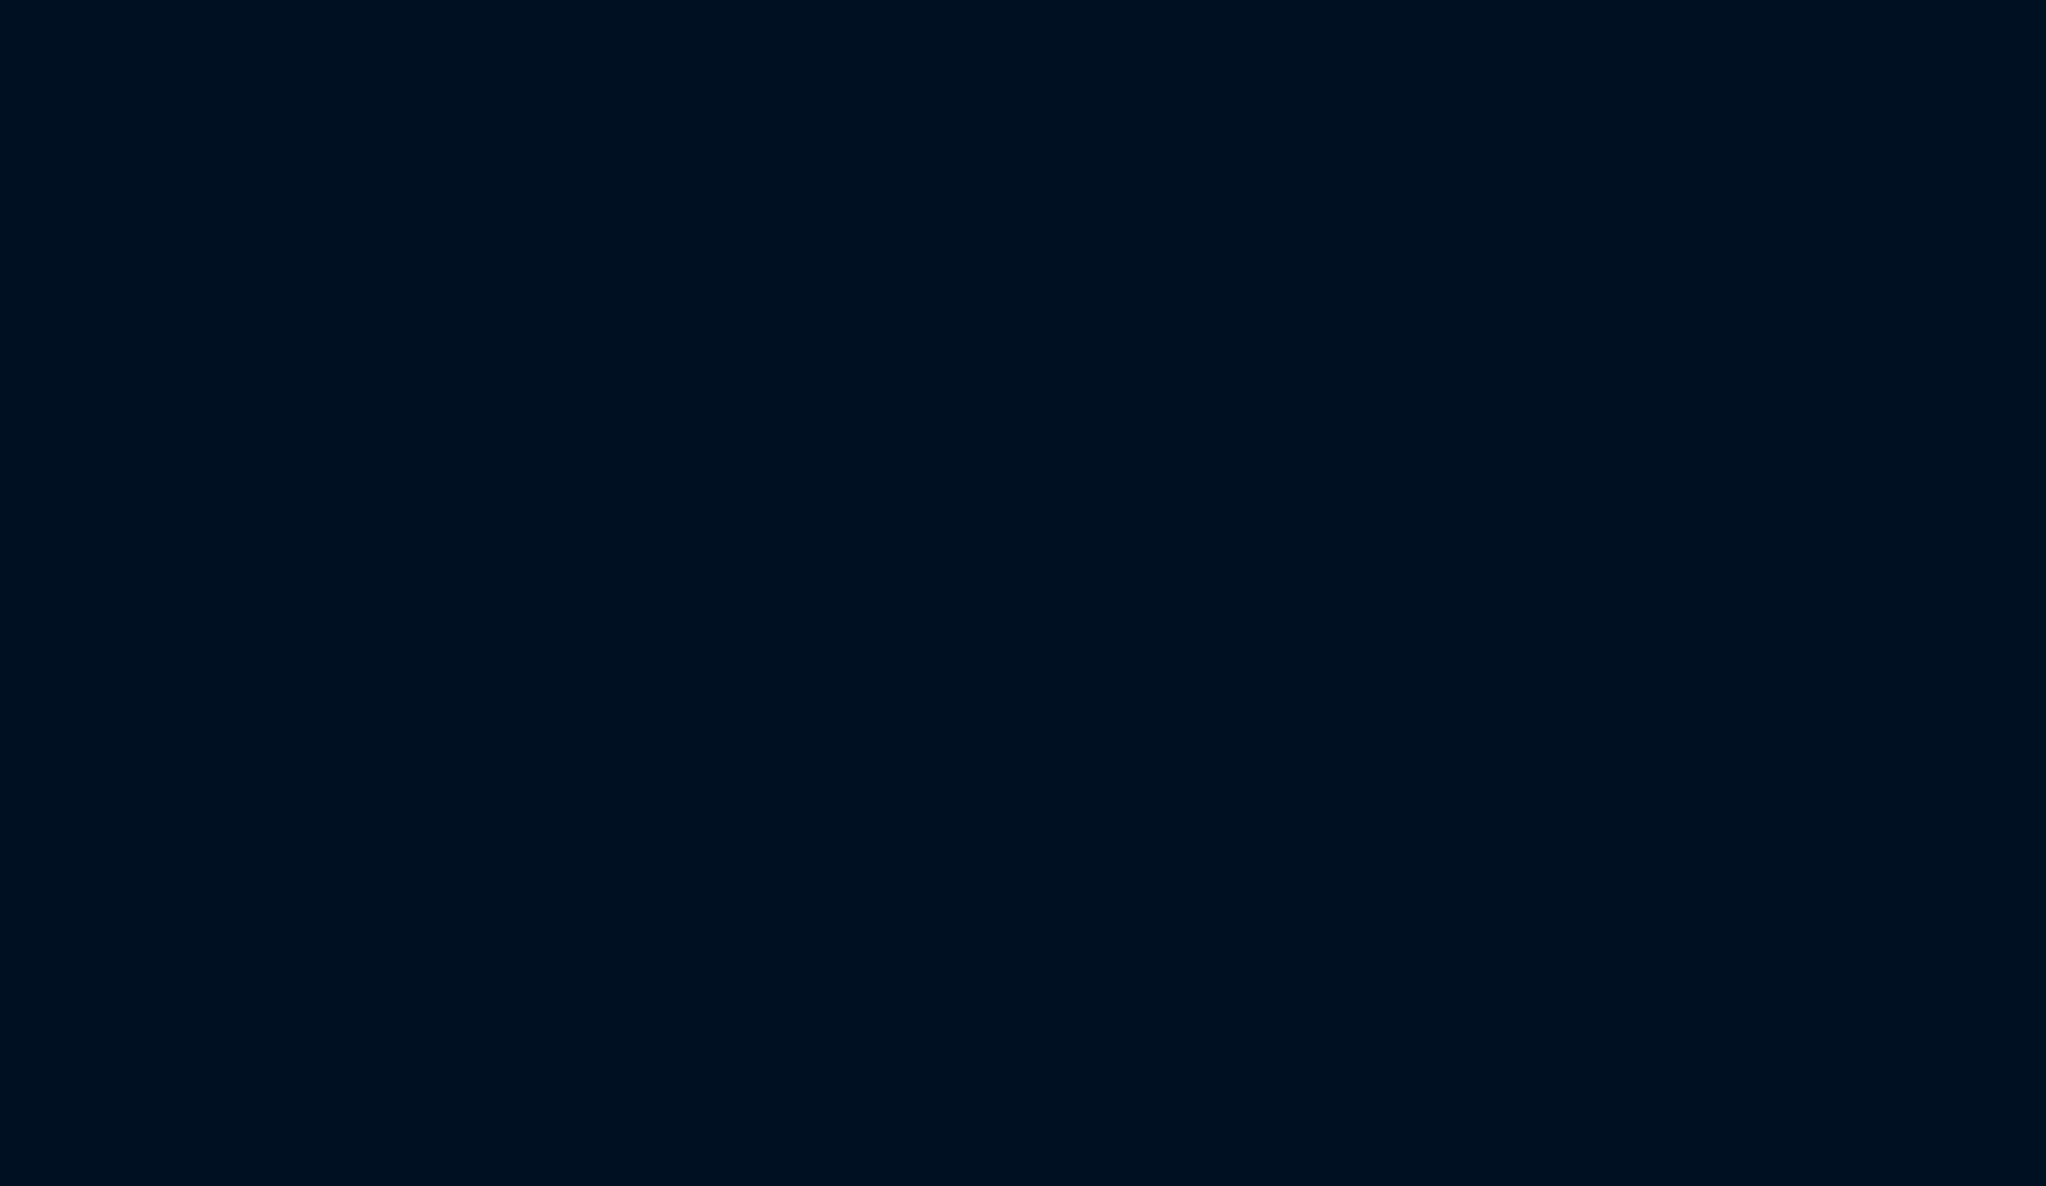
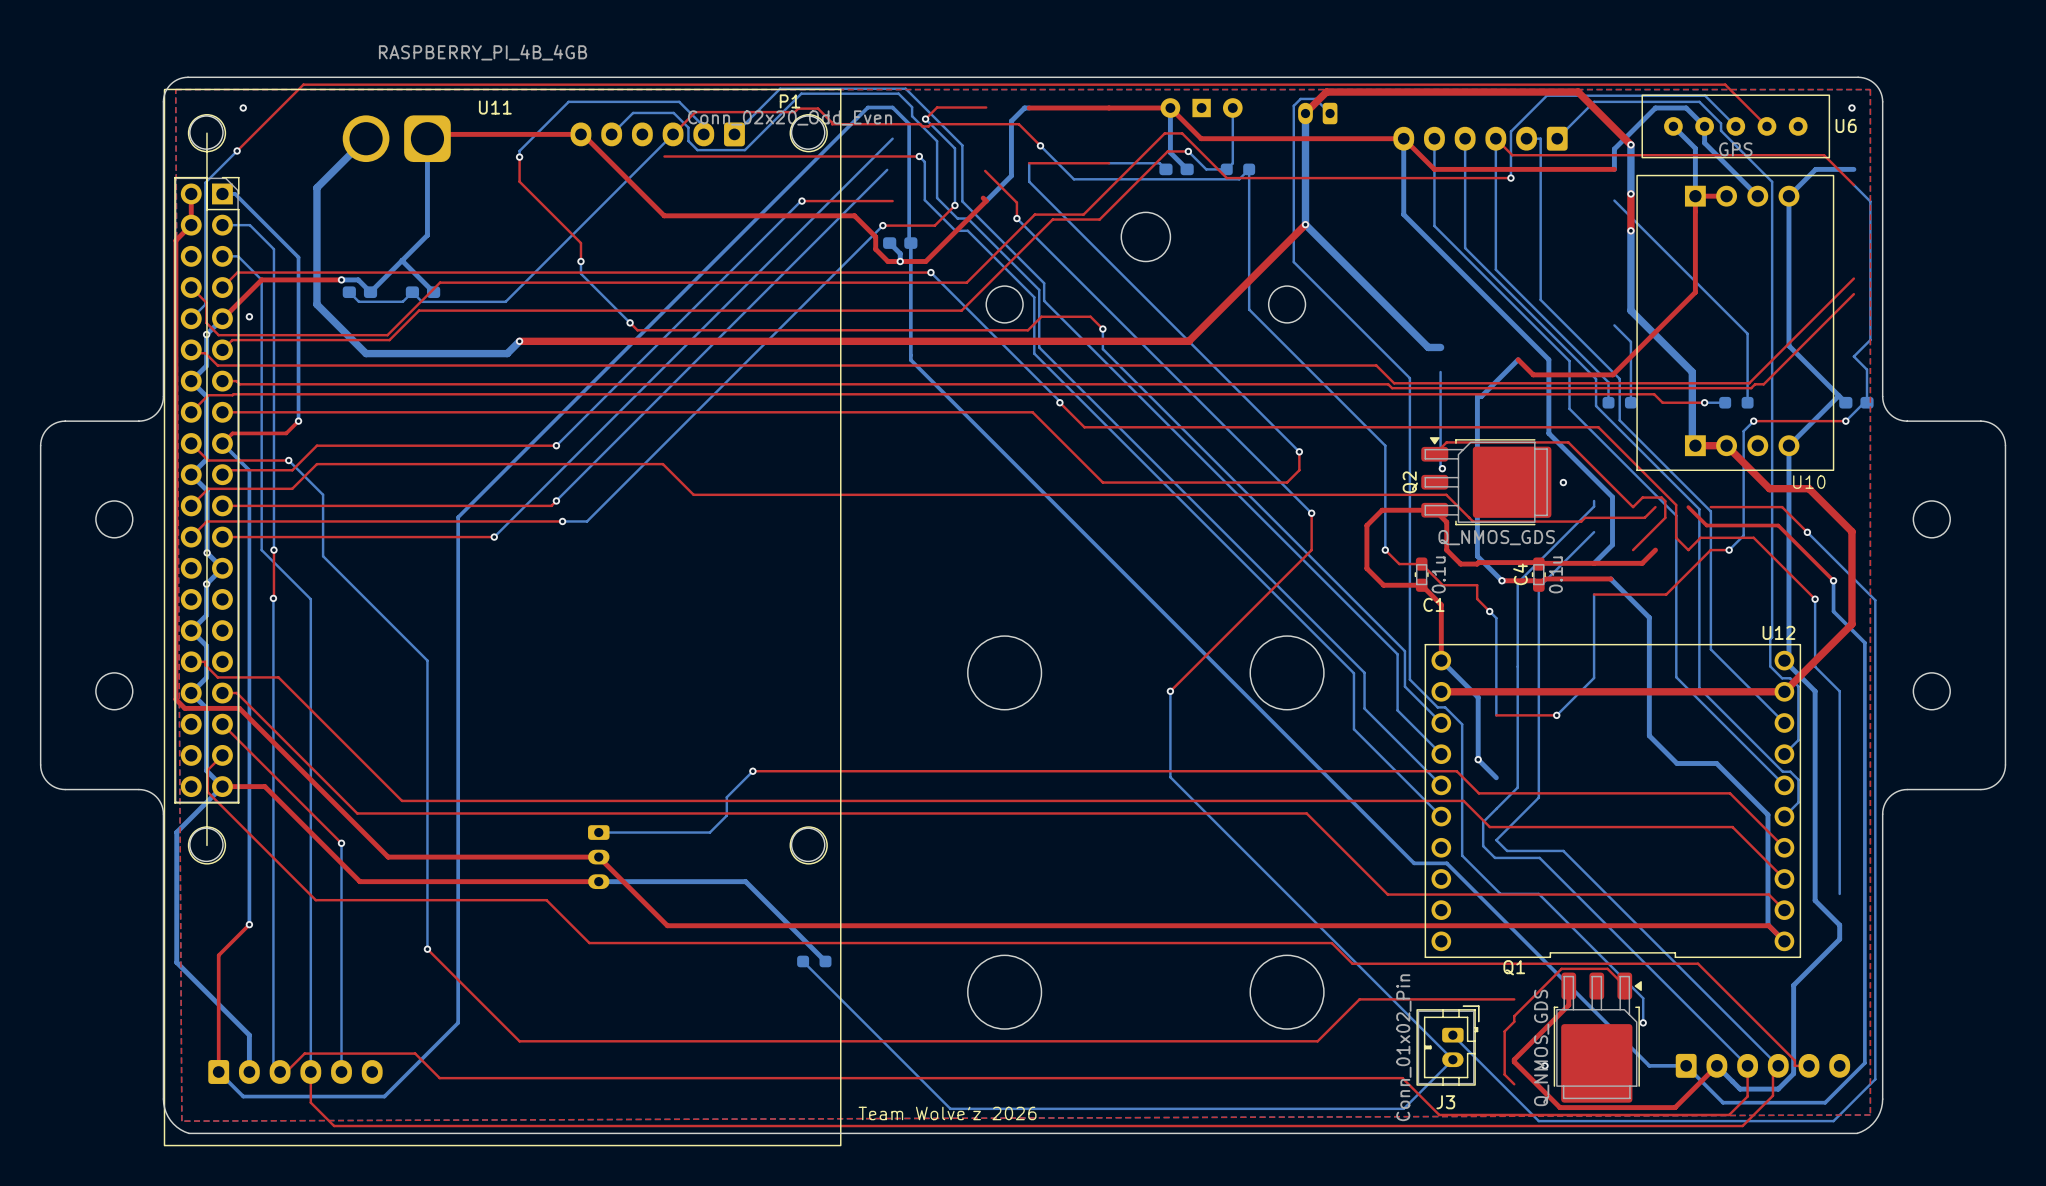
board edge: none -> (188, 77) (1858, 77) (1871, 81) (1880, 91) (1882, 101) (1884, 404) (1891, 415) (1904, 420) (1989, 422) (2001, 432) (2005, 445) (2004, 770) (2000, 780) (1989, 788) (1904, 789) (1891, 794) (1884, 806) (1882, 1099) (1878, 1116) (1869, 1127) (1857, 1133) (188, 1133) (180, 1129) (168, 1116) (163, 1099) (162, 806) (154, 794) (141, 789) (57, 788) (47, 782) (41, 770) (40, 445) (46, 430) (57, 422) (141, 420) (154, 415) (162, 404) (163, 99) (167, 88) (172, 82) (188, 77)
top zone outline: none -> (175, 89) (1870, 89) (1870, 1114) (181, 1121) (175, 89)
top track: none -> (986, 107) (937, 107) (925, 119)
via: none -> (243, 108)
top track: none -> (1029, 108) (1170, 108) (1201, 138) (1403, 138) (1434, 169) (1614, 169)
bottom track: none -> (1029, 108) (1024, 108) (1011, 121) (1011, 175) (986, 201)
bottom track: none -> (1170, 108) (1170, 152) (1187, 169)
part: none -> (1201, 108)
bottom track: none -> (1232, 108) (1232, 163) (1226, 169) (1206, 169) (1188, 151)
via: none -> (1851, 108)
top track: none -> (1305, 113) (1326, 92) (1578, 92) (1630, 144)
bottom track: none -> (1305, 113) (1305, 224) (1428, 347) (1440, 347)
part: none -> (1317, 113)
bottom track: none -> (1330, 113) (1315, 98) (1300, 98) (1293, 105) (1293, 262) (1409, 378) (1409, 679) (1437, 707) (1445, 707) (1462, 724) (1462, 855) (1500, 893) (1538, 893) (1643, 998) (1643, 1022)
round board edge: none -> [189, 115, 224, 150]
round board edge: none -> [790, 115, 826, 150]
bottom track: none -> (925, 119) (954, 148) (954, 205)
via: none -> (925, 119)
bottom track: none -> (1673, 126) (1695, 148) (1695, 196)
bottom track: none -> (1735, 126) (1705, 95) (1546, 95) (1510, 131) (1510, 178)
U6: none -> GPS (1735, 126)
top track: none -> (1766, 126) (1725, 84) (303, 84) (237, 150)
bottom track: none -> (611, 134) (633, 112) (673, 112) (688, 127) (688, 141) (697, 150) (744, 150) (801, 93) (898, 93) (912, 107) (912, 116) (937, 141) (937, 198) (957, 218) (967, 218) (1039, 289) (1039, 347) (1364, 672) (1364, 708) (1441, 785)
part: none -> (657, 134)
top track: none -> (673, 134) (695, 112) (794, 112) (798, 108) (818, 108) (832, 124) (920, 124) (922, 126) (928, 126) (930, 124) (1018, 124) (1040, 145)
bottom track: none -> (673, 134) (505, 301) (422, 301) (412, 292) (402, 301) (358, 301) (349, 292)
bottom track: none -> (703, 134) (703, 126) (679, 101) (568, 101) (519, 150) (519, 157)
bottom track: none -> (734, 134) (780, 88) (905, 88) (962, 145) (962, 201) (1044, 283) (1044, 300) (1397, 654) (1397, 710) (1441, 754)
bottom track: none -> (366, 138) (316, 187) (316, 304) (366, 353) (507, 353) (519, 341)
part: none -> (396, 138)
top track: none -> (427, 138) (431, 134) (582, 134) (664, 215) (854, 215) (875, 236) (875, 249) (887, 261) (925, 261) (986, 201) (983, 198)
bottom track: none -> (427, 138) (427, 235) (370, 292) (358, 279) (341, 279)
bottom track: none -> (892, 138) (494, 537)
bottom track: none -> (1403, 138) (1403, 214) (1548, 359) (1548, 433) (1612, 497) (1612, 544) (1594, 563)
bottom track: none -> (1434, 138) (1434, 225) (1569, 361) (1569, 408) (1676, 515) (1676, 677) (1784, 785)
bottom track: none -> (1465, 138) (1465, 248) (1596, 379) (1596, 405) (1699, 509) (1699, 688) (1782, 771) (1790, 771) (1798, 779) (1798, 802) (1784, 816)
part: none -> (1480, 138)
top track: none -> (1495, 138) (1512, 155) (1824, 155) (1853, 184)
bottom track: none -> (1495, 138) (1495, 269) (1608, 382) (1608, 402)
bottom track: none -> (1526, 138) (1540, 138) (1540, 299) (1619, 378) (1619, 420) (1710, 511) (1710, 649) (1784, 722)
bottom track: none -> (1557, 138) (1594, 101) (1699, 101) (1721, 123) (1721, 130) (1772, 181) (1772, 637) (1770, 639) (1770, 666) (1782, 678) (1790, 678) (1798, 686) (1798, 740) (1784, 754)
bottom track: none -> (1630, 144) (1630, 193)
via: none -> (1630, 144)
bottom track: none -> (1040, 145) (1073, 179) (1239, 179) (1249, 169) (1249, 309) (1385, 445) (1385, 550)
via: none -> (1040, 145)
bottom track: none -> (237, 150) (205, 182) (205, 304) (191, 318)
via: none -> (237, 150)
top track: none -> (1188, 151) (1167, 151) (1099, 219) (1052, 219) (961, 310) (419, 310) (389, 340) (232, 340) (222, 349)
via: none -> (1188, 151)
top track: none -> (664, 156) (919, 156)
bottom track: none -> (919, 156) (924, 161) (924, 200) (955, 230) (967, 230) (1034, 297) (1034, 353) (1353, 673) (1353, 729) (1441, 816)
via: none -> (919, 156)
top track: none -> (519, 157) (519, 181) (580, 243) (580, 261)
via: none -> (519, 157)
top track: none -> (1029, 163) (1109, 163)
bottom track: none -> (1029, 163) (1029, 181) (1299, 451)
bottom track: none -> (1109, 163) (1159, 163) (1165, 169)
bottom track: none -> (887, 169) (556, 500)
part: none -> (1176, 169)
part: none -> (1237, 169)
bottom track: none -> (1614, 169) (1614, 149) (1655, 108) (1686, 108) (1704, 126) (1704, 143) (1757, 196)
bottom track: none -> (1853, 169) (1815, 169) (1788, 196) (1788, 345) (1845, 402)
top track: none -> (985, 170) (1016, 202) (1016, 218)
top track: none -> (1510, 178) (1226, 178) (1182, 133) (1164, 133) (1083, 214) (1034, 214) (966, 282) (440, 282) (387, 335) (218, 335) (206, 322) (206, 302) (191, 287)
via: none -> (1510, 178)
bottom track: none -> (1853, 184) (1870, 201) (1870, 340) (1853, 356) (1867, 369) (1867, 402) (1864, 402) (1845, 421)
top track: none -> (191, 193) (191, 225) (175, 240) (175, 699) (184, 708) (239, 708) (388, 857) (598, 857) (667, 925) (1768, 925) (1784, 941)
bottom track: none -> (222, 193) (235, 193) (298, 257) (298, 421)
top track: none -> (1630, 193) (1630, 230)
via: none -> (1630, 193)
top track: none -> (1726, 196) (1695, 196) (1695, 292) (1612, 374) (1533, 374) (1518, 359)
bottom track: none -> (1614, 200) (1747, 333) (1747, 402)
top track: none -> (801, 201) (892, 201)
bottom track: none -> (802, 201) (556, 445)
via: none -> (802, 201)
top track: none -> (954, 205) (934, 225) (882, 225)
via: none -> (954, 205)
round board edge: none -> [1120, 211, 1172, 263]
bottom track: none -> (1016, 218) (1311, 513)
via: none -> (1016, 218)
top track: none -> (1305, 224) (1188, 341) (519, 341)
via: none -> (1305, 224)
bottom track: none -> (222, 225) (249, 225) (273, 249) (273, 550)
bottom track: none -> (882, 225) (587, 521) (562, 521)
via: none -> (882, 225)
bottom track: none -> (1630, 230) (1630, 310) (1692, 372) (1692, 442) (1695, 445)
via: none -> (1630, 230)
bottom track: none -> (889, 243) (900, 253) (900, 261)
part: none -> (900, 243)
bottom track: none -> (910, 243) (910, 360) (1414, 863) (1446, 863) (1649, 1065) (1686, 1065) (1723, 1102) (1825, 1102) (1864, 1063) (1864, 642) (1833, 611) (1833, 580)
bottom track: none -> (910, 243) (909, 241) (909, 124) (892, 107) (867, 107) (458, 517) (458, 1022) (384, 1096) (243, 1096) (218, 1071)
bottom track: none -> (222, 256) (238, 256) (261, 279) (261, 550) (310, 599) (310, 1071)
bottom track: none -> (402, 260) (433, 292)
bottom track: none -> (580, 261) (580, 273) (630, 322)
via: none -> (580, 261)
via: none -> (900, 261)
top track: none -> (930, 272) (237, 272) (222, 287)
bottom track: none -> (930, 272) (1059, 402)
via: none -> (930, 272)
top track: none -> (1853, 278) (1749, 383) (1394, 383) (1376, 365) (217, 365) (205, 353) (194, 353) (191, 349)
top track: none -> (341, 279) (261, 279) (222, 318)
via: none -> (341, 279)
round board edge: none -> [985, 285, 1024, 324]
round board edge: none -> [1268, 285, 1307, 324]
part: none -> (359, 292)
part: none -> (423, 292)
top track: none -> (1853, 294) (1763, 384) (1755, 384) (1751, 388) (1392, 388) (1388, 384) (239, 384) (236, 381) (222, 381)
via: none -> (249, 316)
bottom track: none -> (222, 318) (206, 334) (206, 365) (191, 381) (206, 396) (206, 459) (191, 474) (207, 490) (207, 552) (222, 568) (206, 584) (206, 615) (191, 630) (206, 645) (206, 677) (191, 693) (206, 708) (206, 770) (222, 786) (176, 832) (176, 962) (249, 1035) (249, 1071)
top track: none -> (630, 322) (637, 330) (1027, 330) (1041, 316) (1090, 316) (1102, 329)
via: none -> (630, 322)
U10: none -> (1735, 322)
bottom track: none -> (1614, 325) (1630, 341) (1630, 402)
bottom track: none -> (1102, 329) (1102, 349) (1404, 651) (1404, 686) (1441, 722)
via: none -> (1102, 329)
via: none -> (206, 334)
via: none -> (519, 341)
bottom track: none -> (1518, 359) (1481, 396) (1477, 396) (1477, 556) (1501, 580) (1505, 580)
bottom track: none -> (1440, 372) (1440, 466) (1442, 468)
bottom track: none -> (1838, 395) (1788, 445) (1788, 656) (1784, 660) (1815, 691) (1815, 900) (1839, 925) (1839, 939) (1793, 985) (1793, 1073) (1778, 1089) (1740, 1089) (1716, 1065)
top track: none -> (1059, 402) (1084, 427) (1598, 427) (1676, 505) (1676, 537) (1688, 550) (1700, 537) (1753, 537) (1815, 599)
via: none -> (1059, 402)
part: none -> (1619, 402)
top track: none -> (1704, 402) (1662, 402) (1654, 394) (233, 394) (208, 395) (191, 412)
bottom track: none -> (1704, 402) (1725, 402)
via: none -> (1704, 402)
part: none -> (1736, 402)
part: none -> (1856, 402)
top track: none -> (222, 412) (1032, 412) (1102, 482) (1287, 482) (1299, 470) (1299, 451)
top track: none -> (298, 421) (286, 433) (232, 433) (222, 443)
via: none -> (298, 421)
top track: none -> (1753, 421) (1845, 421)
bottom track: none -> (1753, 421) (1743, 431) (1743, 535) (1729, 550)
via: none -> (1753, 421)
via: none -> (1845, 421)
top track: none -> (191, 443) (208, 460) (288, 460)
bottom track: none -> (222, 443) (249, 470) (249, 924)
top track: none -> (556, 445) (316, 445) (292, 470) (226, 470) (222, 474)
via: none -> (556, 445)
top track: none -> (1695, 445) (1726, 445) (1769, 488) (1808, 488) (1851, 531) (1851, 624) (1784, 691) (1441, 691)
via: none -> (1299, 451)
top track: none -> (1434, 454) (1446, 442) (1568, 442) (1633, 507) (1642, 497) (1661, 497) (1665, 501) (1665, 517) (1633, 550)
bottom track: none -> (288, 460) (323, 494) (323, 556) (427, 660) (427, 949)
via: none -> (288, 460)
via: none -> (1442, 468)
Q2: none -> Q_NMOS_GDS (1486, 481)
via: none -> (1563, 482)
round board edge: none -> [95, 500, 134, 539]
top track: none -> (227, 500) (222, 505) (551, 505) (556, 500)
via: none -> (556, 500)
bottom track: none -> (1594, 500) (1594, 506) (1517, 582) (1517, 787) (1483, 822) (1483, 846) (1495, 857) (1539, 857) (1747, 1065)
round board edge: none -> [1912, 500, 1951, 539]
top track: none -> (191, 505) (208, 488) (292, 488) (316, 464) (662, 464) (693, 494) (1446, 494) (1473, 521) (1581, 521) (1585, 517) (1644, 517) (1655, 507)
top track: none -> (1688, 507) (1706, 525) (1778, 525) (1833, 580)
top track: none -> (1710, 507) (1782, 507) (1807, 532)
top track: none -> (1311, 513) (1311, 550) (1170, 691)
via: none -> (1311, 513)
top track: none -> (562, 521) (206, 521) (191, 537)
via: none -> (562, 521)
bottom track: none -> (1594, 532) (1538, 587) (1538, 797) (1496, 840) (1507, 850) (1563, 850) (1778, 1065)
bottom track: none -> (1807, 532) (1875, 600) (1875, 1079) (1833, 1121) (1538, 1121) (1452, 1035)
via: none -> (1807, 532)
top track: none -> (222, 537) (494, 537)
via: none -> (494, 537)
top track: none -> (273, 550) (273, 598)
via: none -> (273, 550)
top track: none -> (1385, 550) (1399, 564) (1421, 564) (1442, 585) (1477, 585) (1477, 598) (1489, 611)
via: none -> (1385, 550)
top track: none -> (1655, 550) (1642, 563) (1460, 564) (1446, 550) (1446, 522) (1434, 510) (1382, 510) (1366, 525) (1366, 568) (1383, 585) (1421, 585) (1441, 604) (1441, 660)
top track: none -> (1729, 550) (1710, 550) (1666, 594) (1594, 594)
via: none -> (1729, 550)
via: none -> (207, 552)
C1: none -> 0.1u (1421, 574)
C4: none -> 0.1u (1538, 574)
top track: none -> (1610, 578) (1545, 578) (1538, 585)
bottom track: none -> (1610, 578) (1649, 617) (1649, 735) (1677, 763) (1716, 763) (1767, 814) (1767, 924) (1784, 941)
top track: none -> (1501, 580) (1534, 580) (1538, 585)
via: none -> (1501, 580)
via: none -> (1833, 580)
via: none -> (206, 584)
bottom track: none -> (1594, 594) (1594, 678) (1556, 715)
bottom track: none -> (273, 598) (273, 1065) (280, 1071)
via: none -> (273, 598)
bottom track: none -> (1815, 599) (1815, 666) (1839, 691) (1839, 893)
via: none -> (1815, 599)
bottom track: none -> (1489, 611) (1496, 618) (1496, 715)
via: none -> (1489, 611)
U11: none -> RASPBERRY_PI_4B_4GB (502, 617)
round board edge: none -> [967, 635, 1043, 711]
round board edge: none -> [1249, 635, 1325, 711]
bottom track: none -> (1441, 660) (1478, 697) (1478, 759) (1496, 777)
top track: none -> (191, 661) (205, 661) (205, 665) (217, 677) (278, 677) (402, 800) (1463, 800) (1489, 827) (1732, 827) (1784, 878)
round board edge: none -> [95, 672, 134, 711]
round board edge: none -> [1912, 672, 1951, 711]
bottom track: none -> (1170, 691) (1170, 777) (1452, 1059)
via: none -> (1170, 691)
top track: none -> (222, 693) (236, 693) (357, 813) (1306, 813) (1387, 894) (1768, 894) (1784, 910)
top track: none -> (1496, 715) (1556, 715)
via: none -> (1556, 715)
top track: none -> (222, 724) (341, 843)
top track: none -> (222, 755) (207, 770) (207, 792) (315, 900) (546, 900) (589, 943) (1331, 943) (1352, 963) (1698, 963) (1794, 1060) (1794, 1065) (1808, 1065)
via: none -> (1478, 759)
top track: none -> (752, 771) (1456, 771) (1478, 793) (1730, 793) (1784, 847)
bottom track: none -> (752, 771) (726, 797) (726, 815) (709, 832) (598, 832)
via: none -> (752, 771)
top track: none -> (222, 786) (264, 786) (359, 881) (598, 881)
U12: none -> (1612, 800)
round board edge: none -> [189, 827, 224, 863]
round board edge: none -> [790, 827, 826, 863]
bottom track: none -> (341, 843) (341, 1071)
via: none -> (341, 843)
part: none -> (598, 857)
bottom track: none -> (598, 881) (745, 881) (825, 961)
top track: none -> (249, 924) (218, 955) (218, 1071)
via: none -> (249, 924)
top track: none -> (427, 949) (519, 1041) (1317, 1041) (1359, 999) (1514, 999)
via: none -> (427, 949)
round board edge: none -> [967, 954, 1043, 1030]
round board edge: none -> [1249, 954, 1325, 1030]
bottom track: none -> (803, 961) (950, 1108) (1403, 1108) (1452, 1059)
part: none -> (814, 961)
top track: none -> (1569, 985) (1568, 1005) (1514, 1059) (1560, 1107) (1675, 1107) (1716, 1065)
top track: none -> (1624, 986) (1607, 968) (1561, 968) (1514, 1016) (1514, 1021) (1504, 1031) (1504, 1074) (1514, 1084)
via: none -> (1643, 1022)
Q1: none -> Q_NMOS_GDS (1597, 1037)
J3: none -> Conn_01x02_Pin (1447, 1045)
via: none -> (1544, 1065)
top track: none -> (1747, 1065) (1747, 1096) (1729, 1114) (1439, 1114) (1402, 1078) (439, 1078) (415, 1053) (304, 1053) (286, 1071) (280, 1071)
part: none -> (1762, 1065)
top track: none -> (1778, 1065) (1772, 1071) (1772, 1095) (1742, 1126) (334, 1126) (310, 1102) (310, 1071)
part: none -> (295, 1071)
text: none -> Team Wolve'z 2026 (947, 1113)

